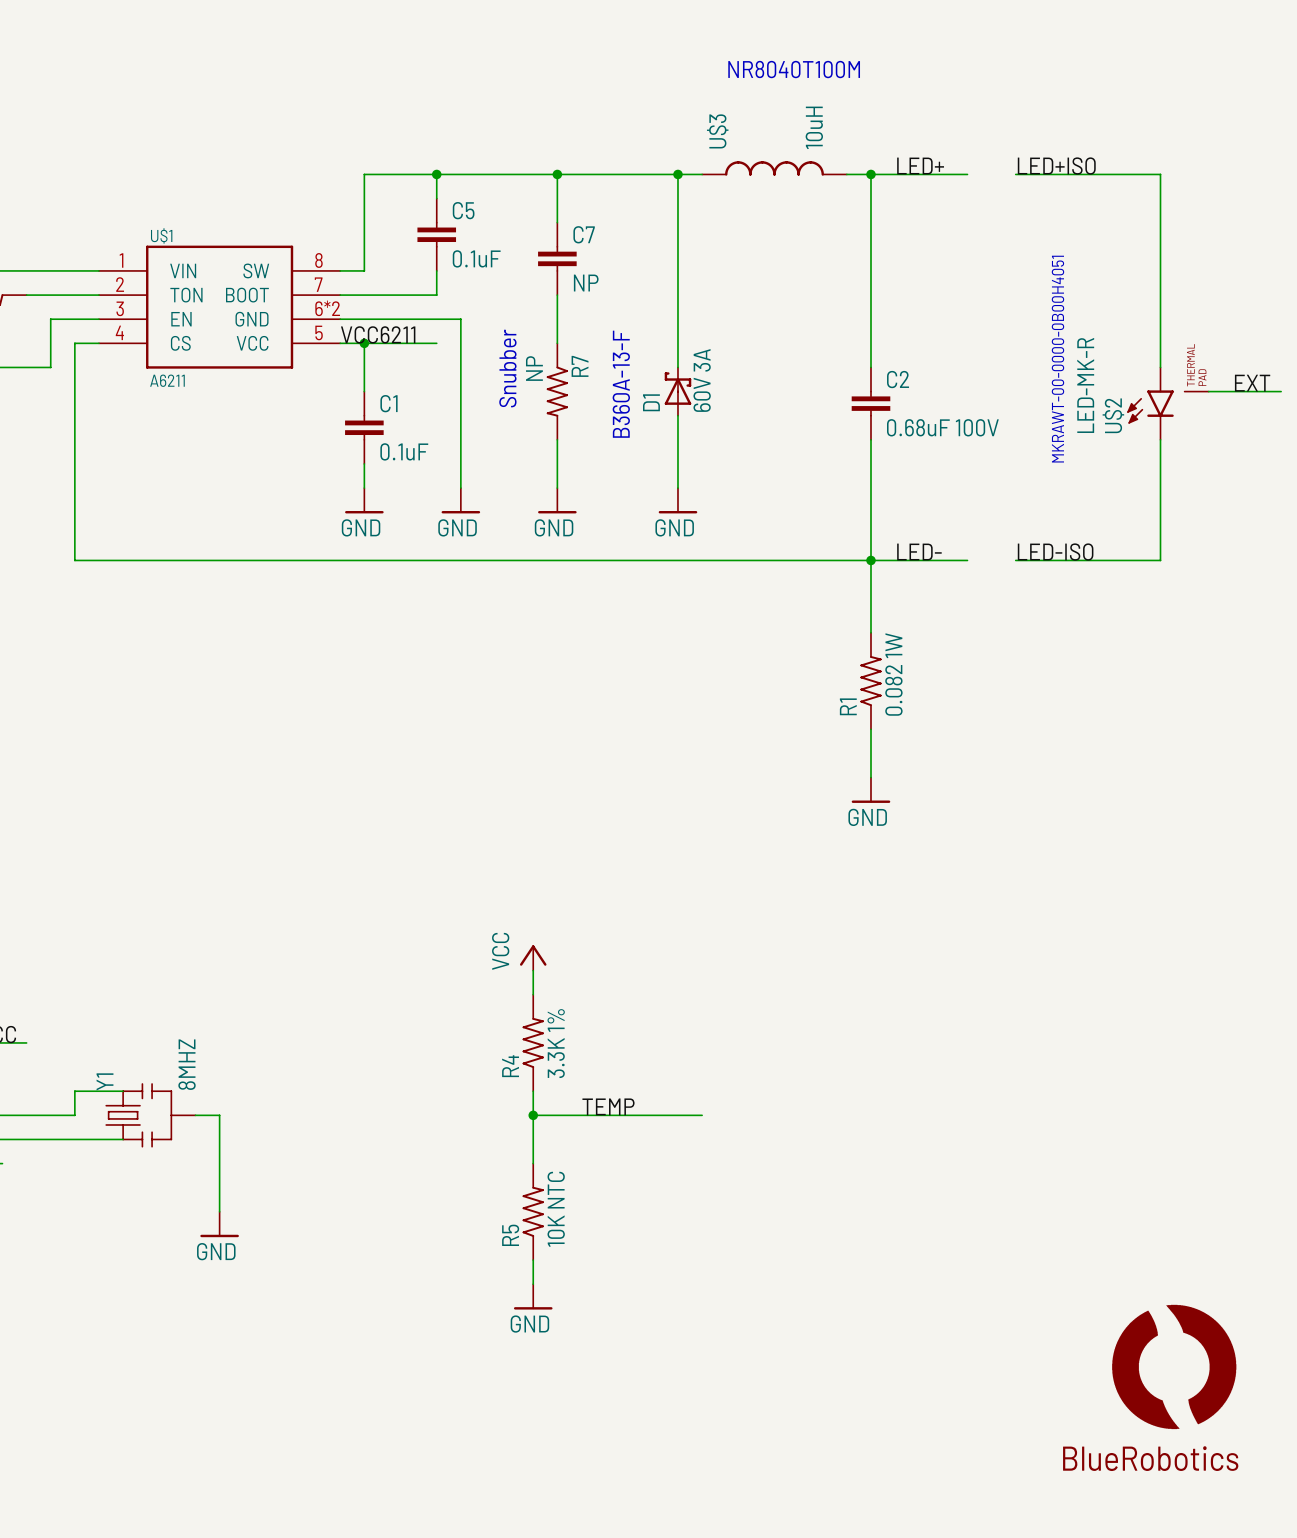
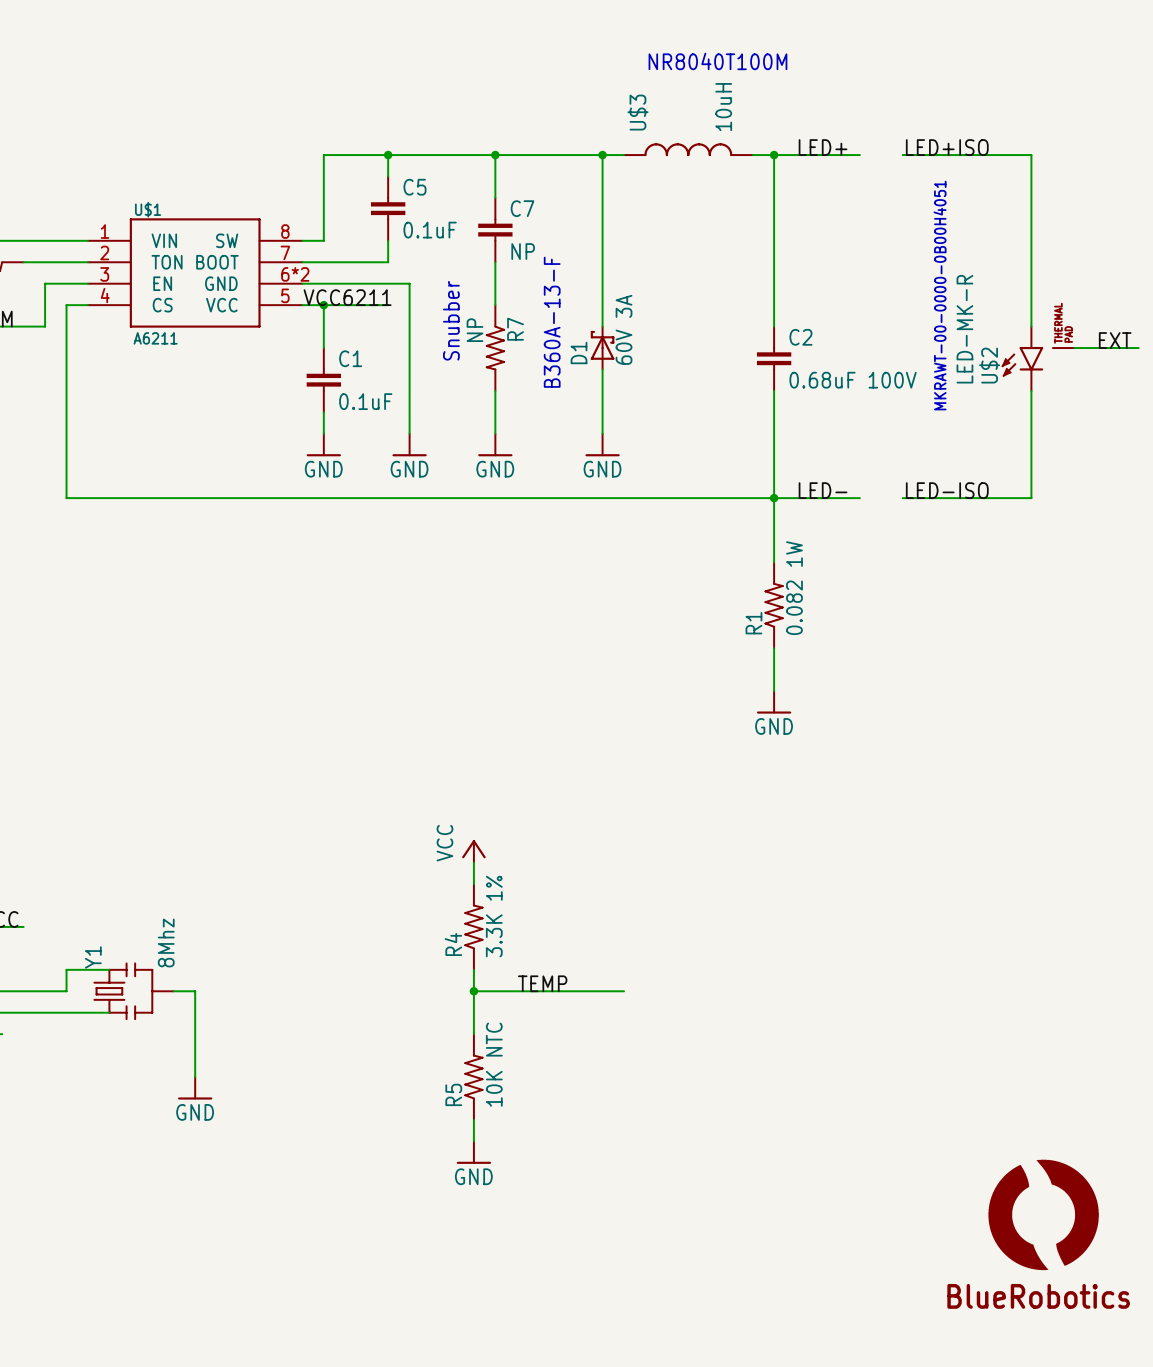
Y1 value: 8MHZ (187, 1064) -> 8Mhz (166, 943)

